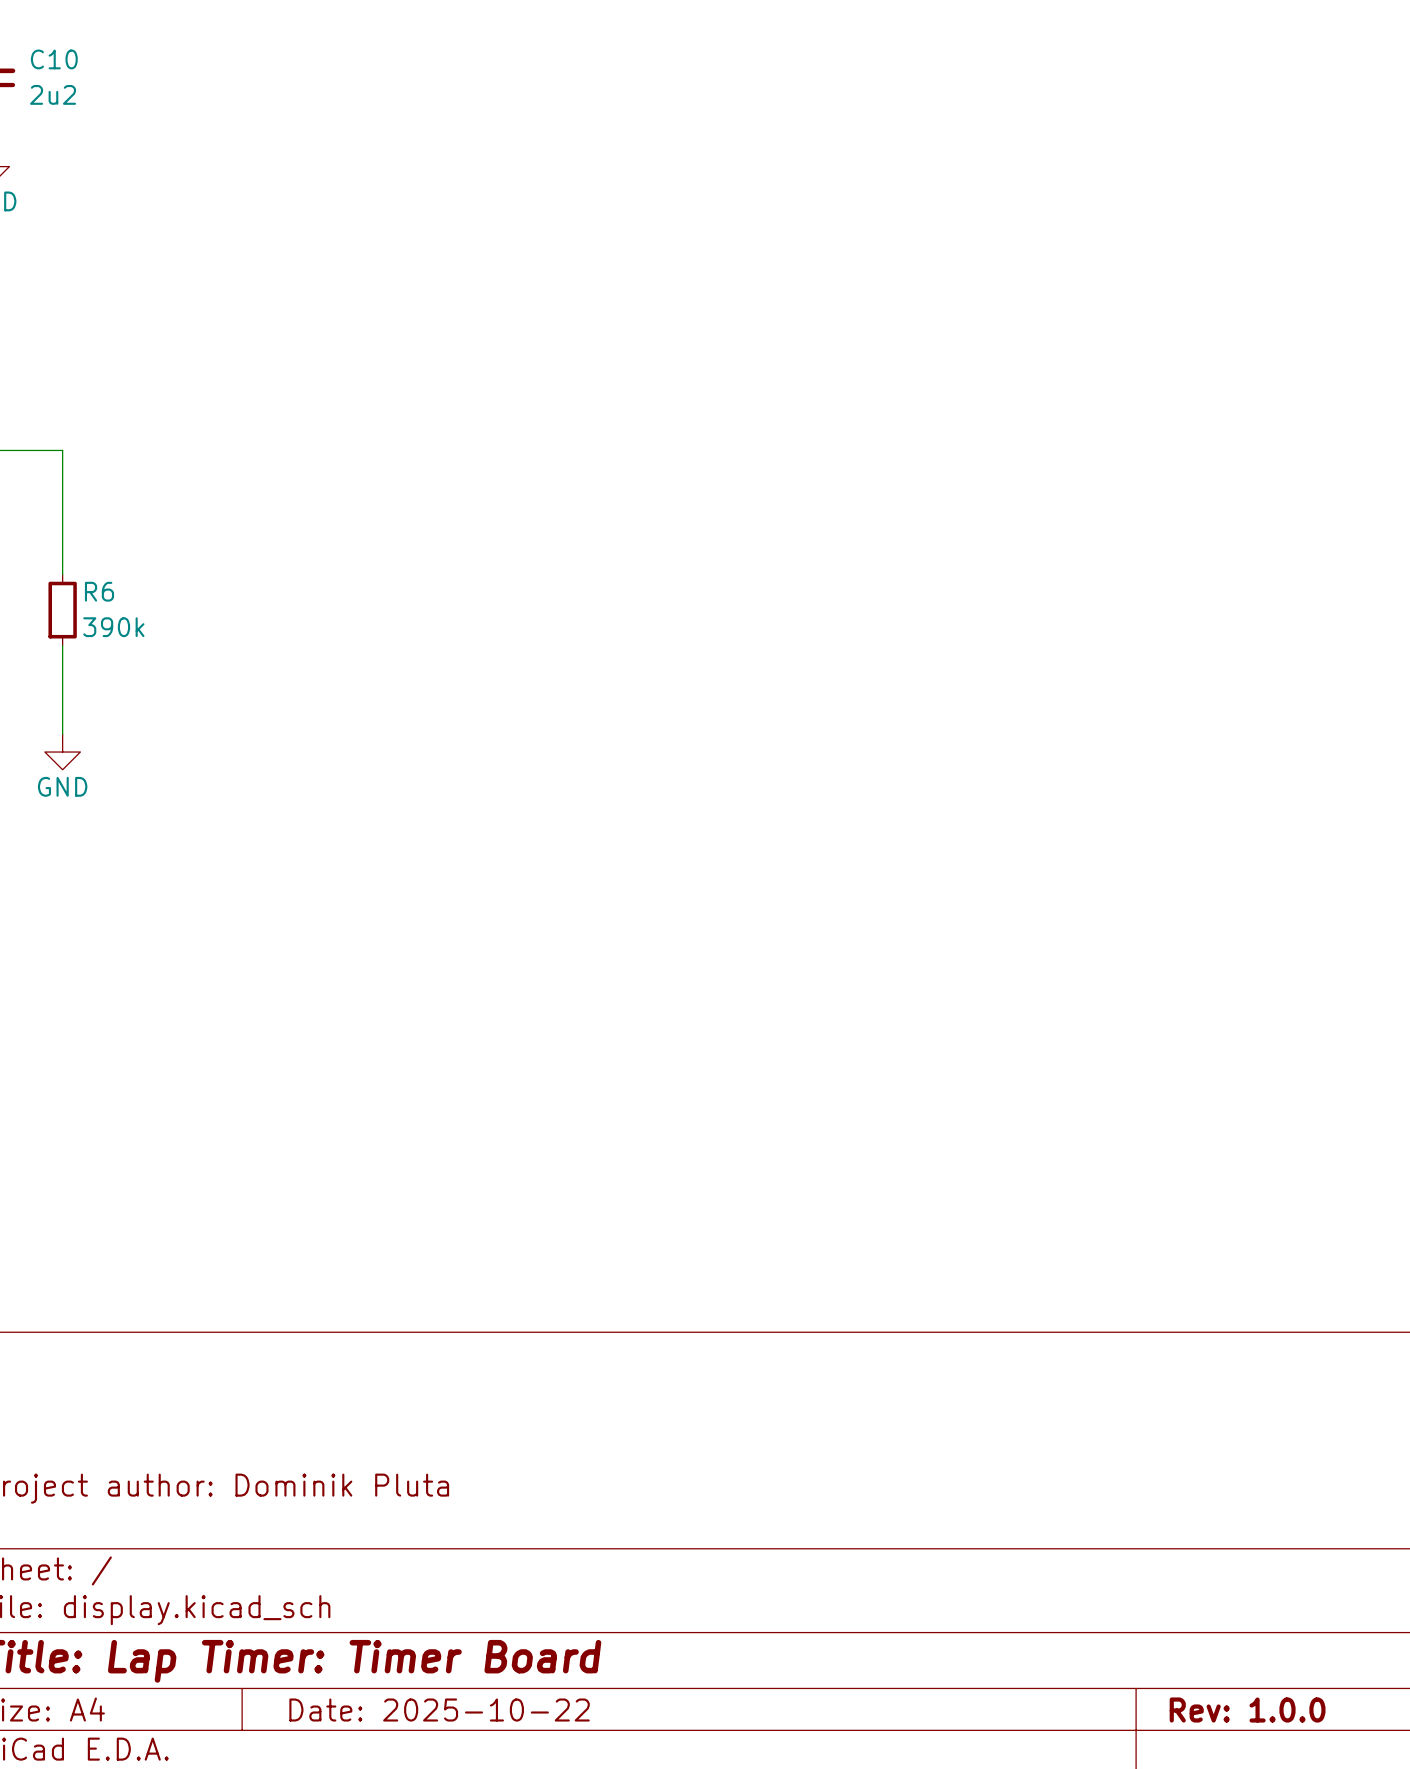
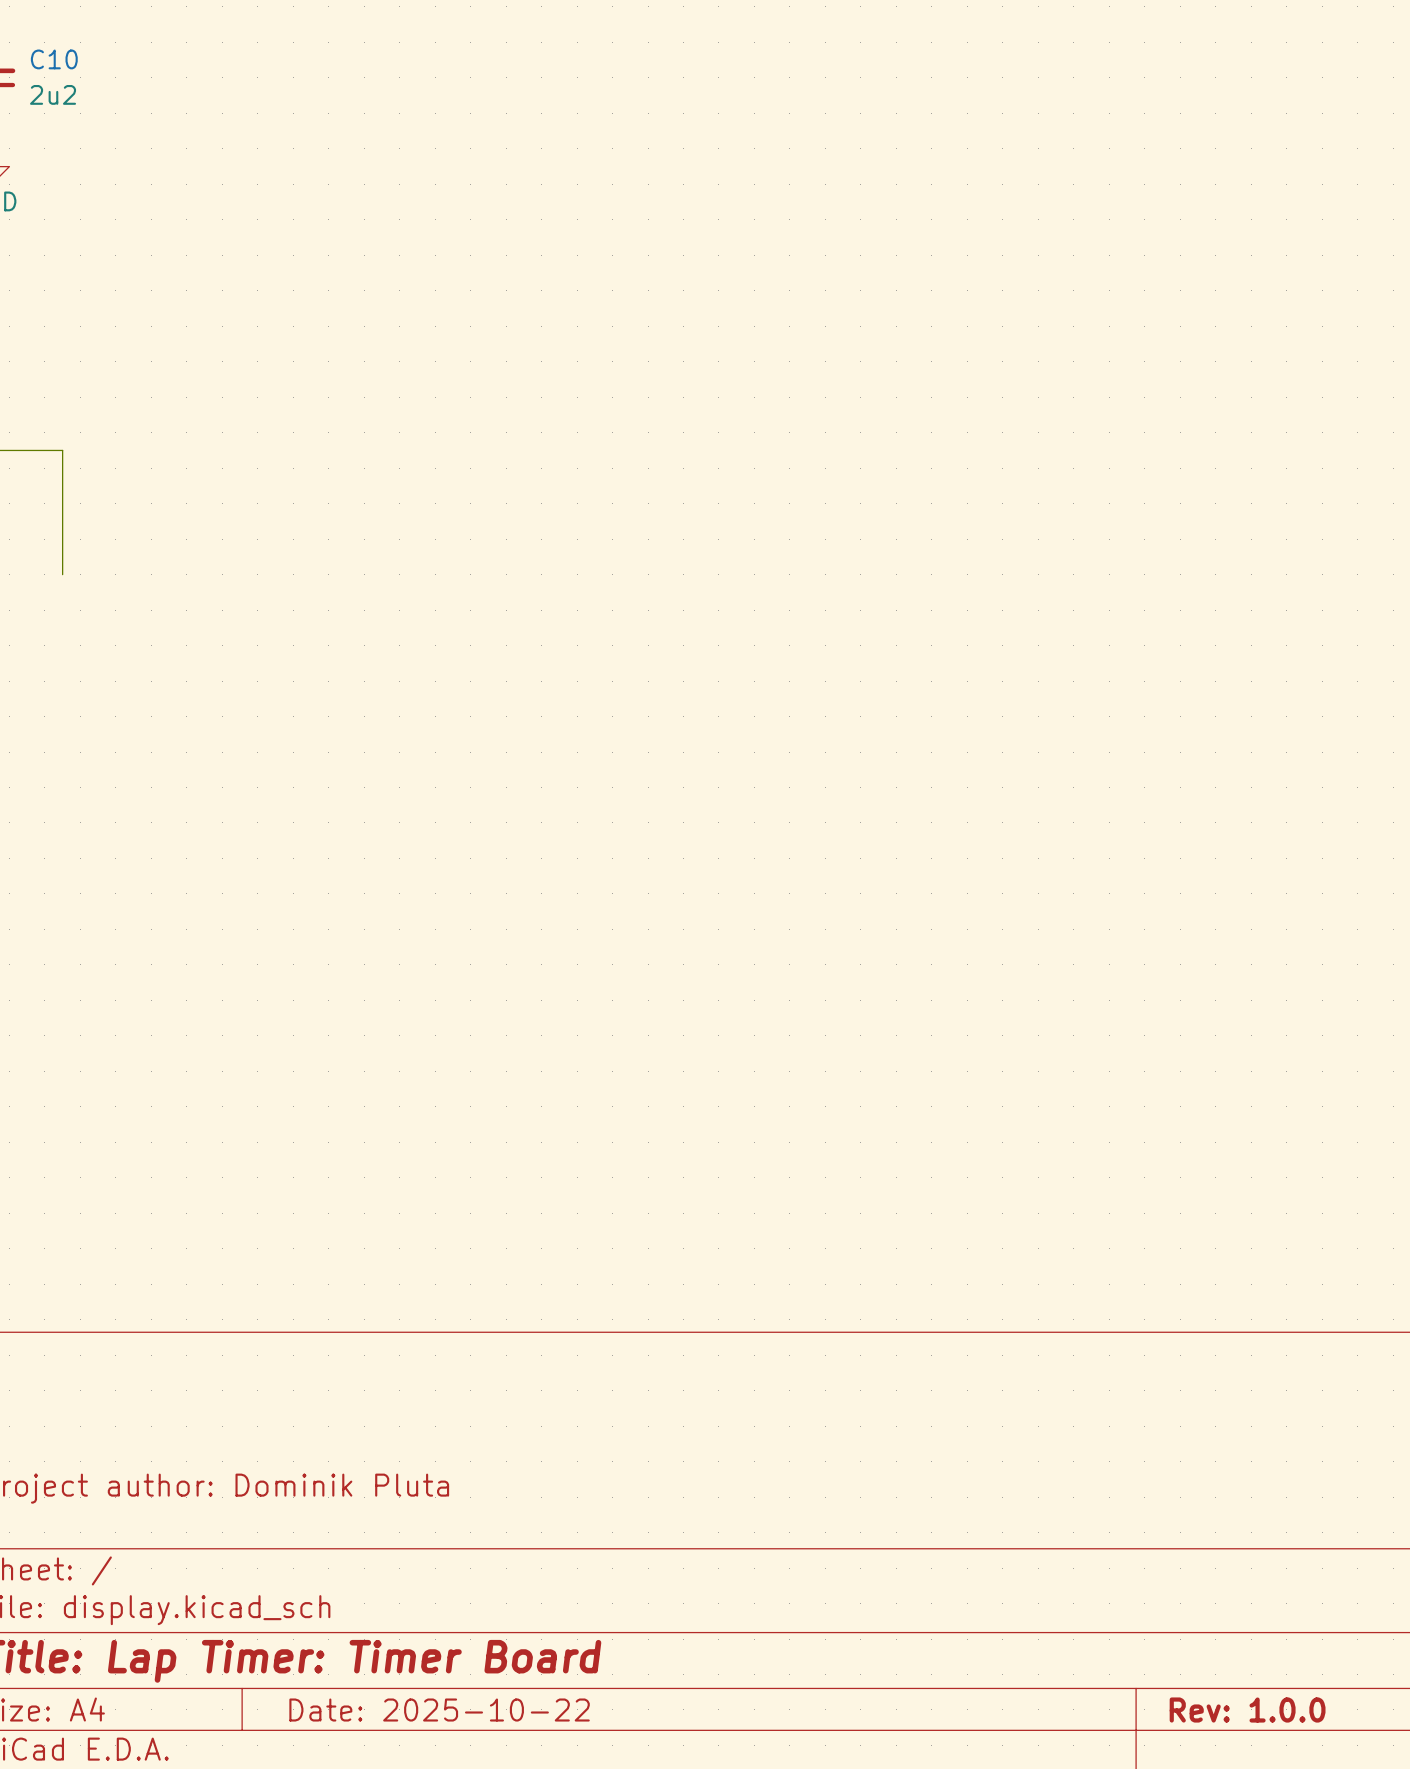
R6: (62, 610) -> none
wire: (62, 645) (62, 734) -> none
power symbol: GND (62, 752) -> none

